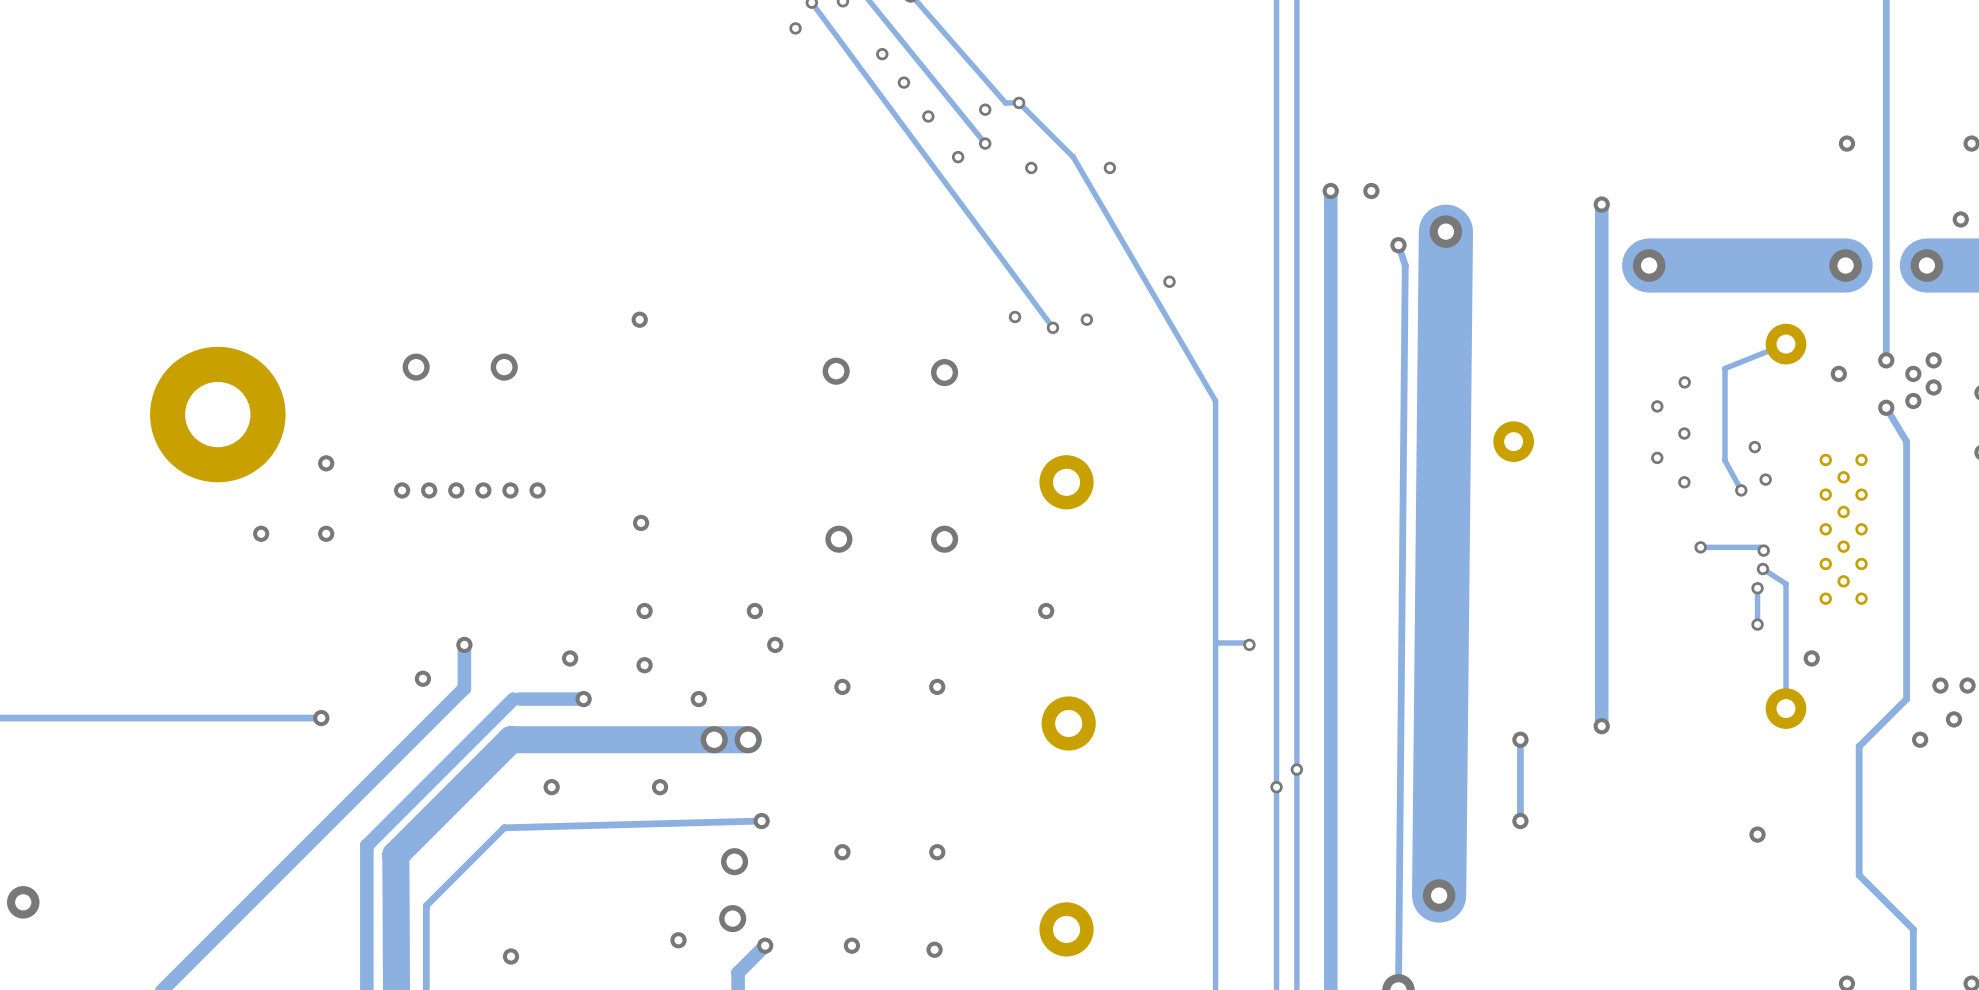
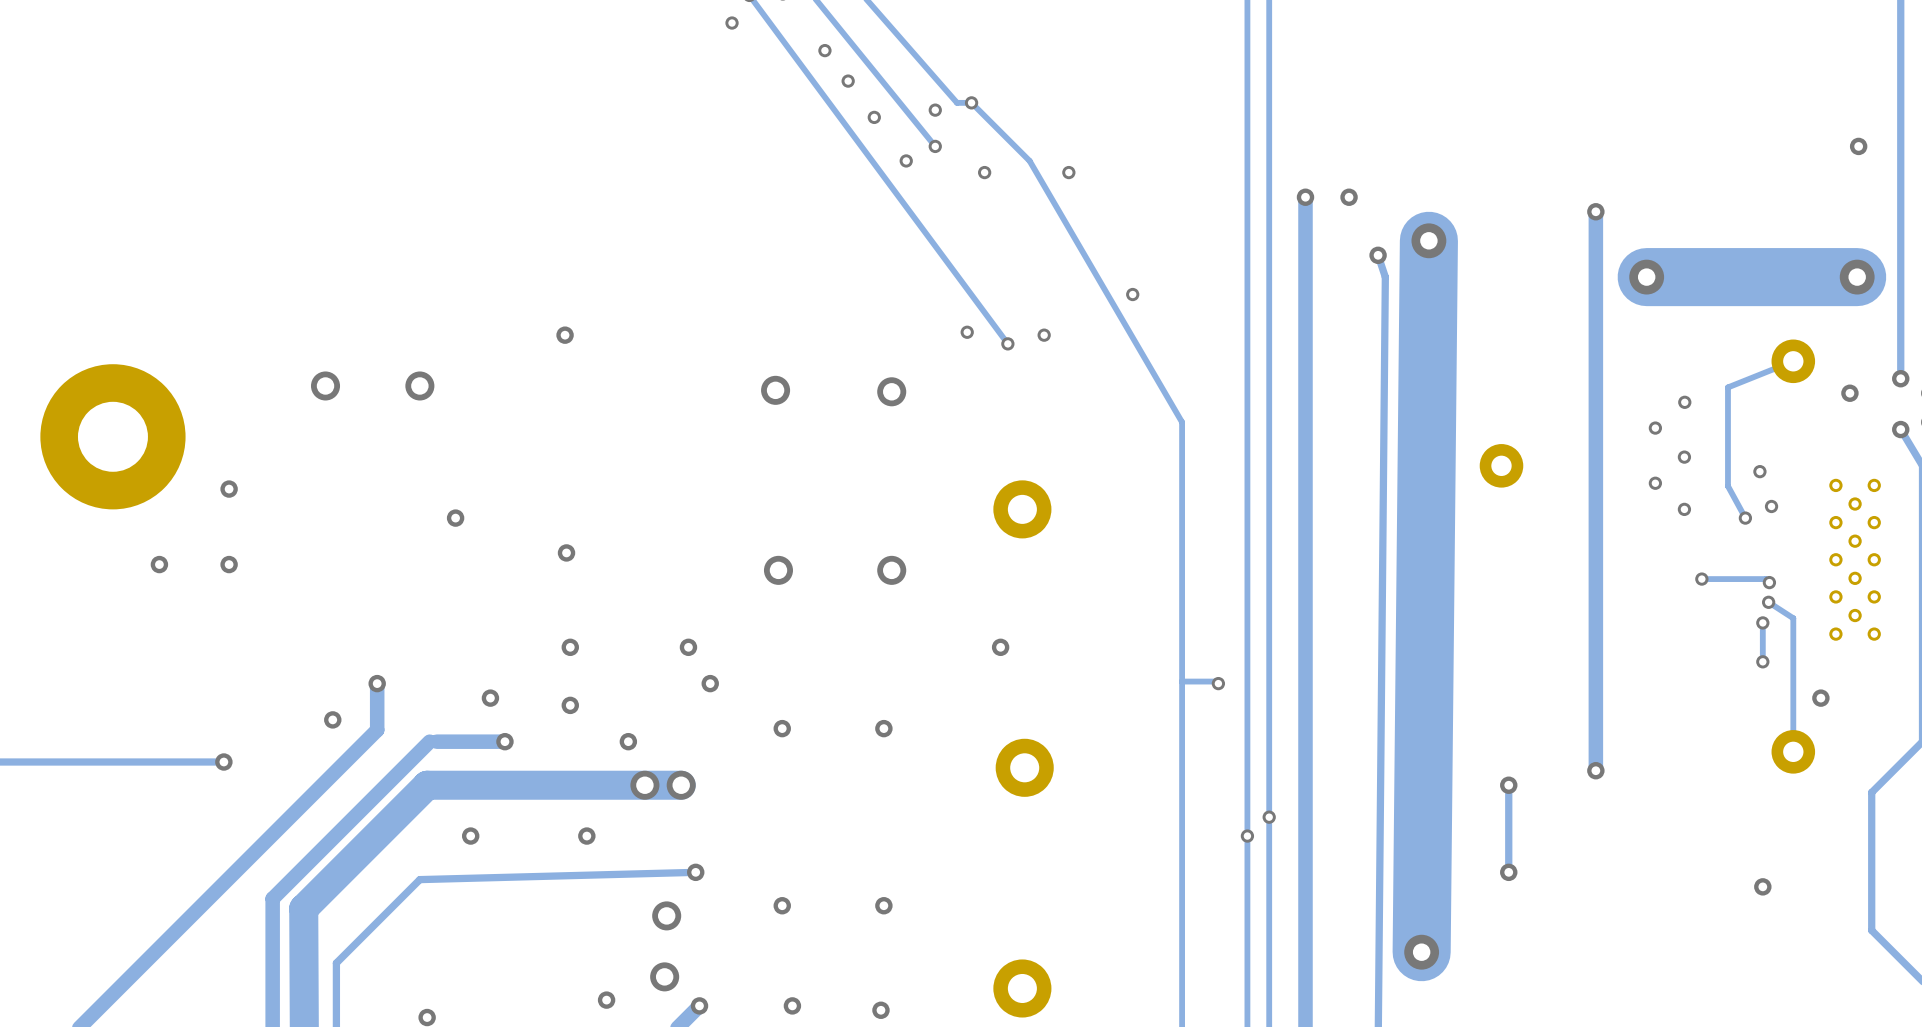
via: (402, 490) -> none
via: (429, 490) -> none
via: (456, 490) -> none
via: (483, 490) -> none
via: (510, 490) -> none

